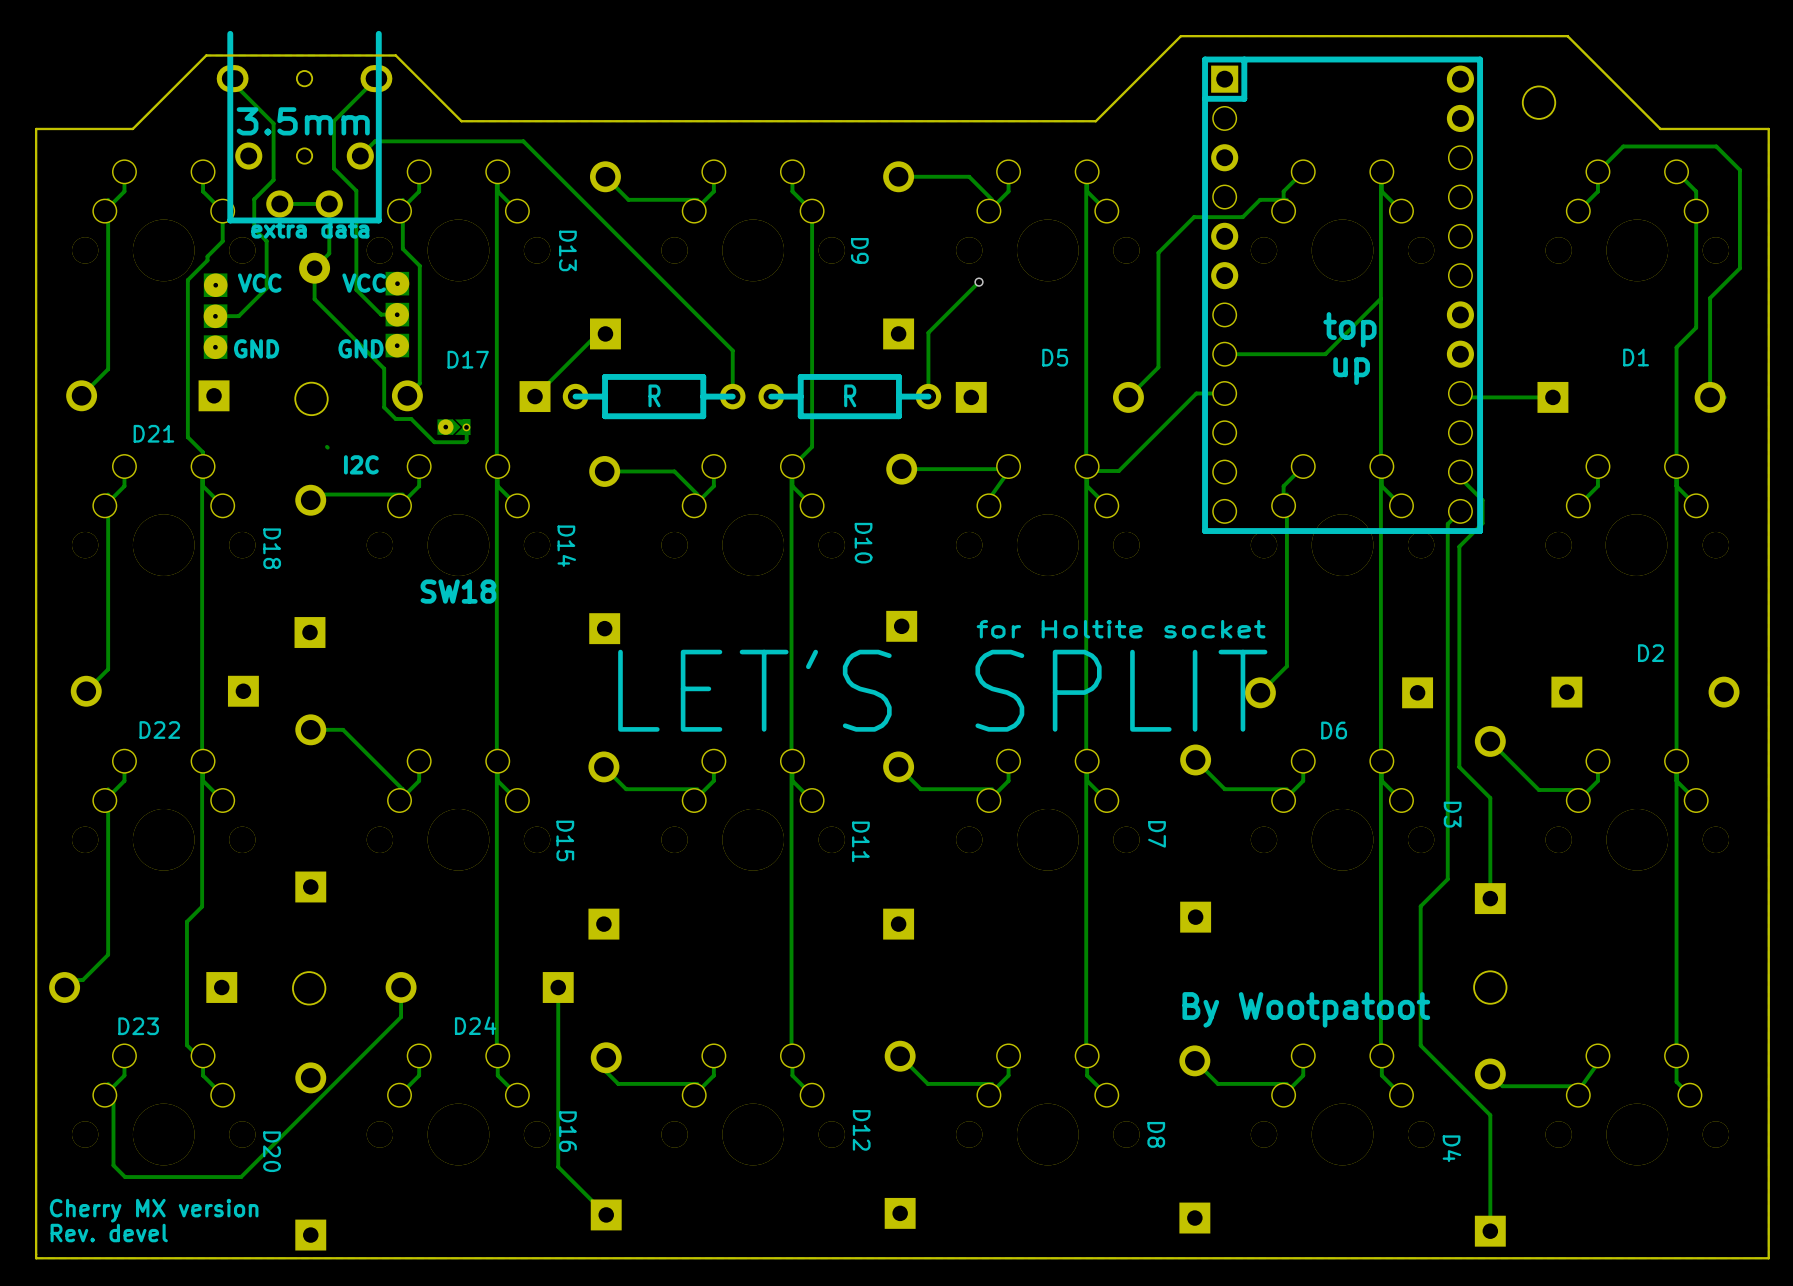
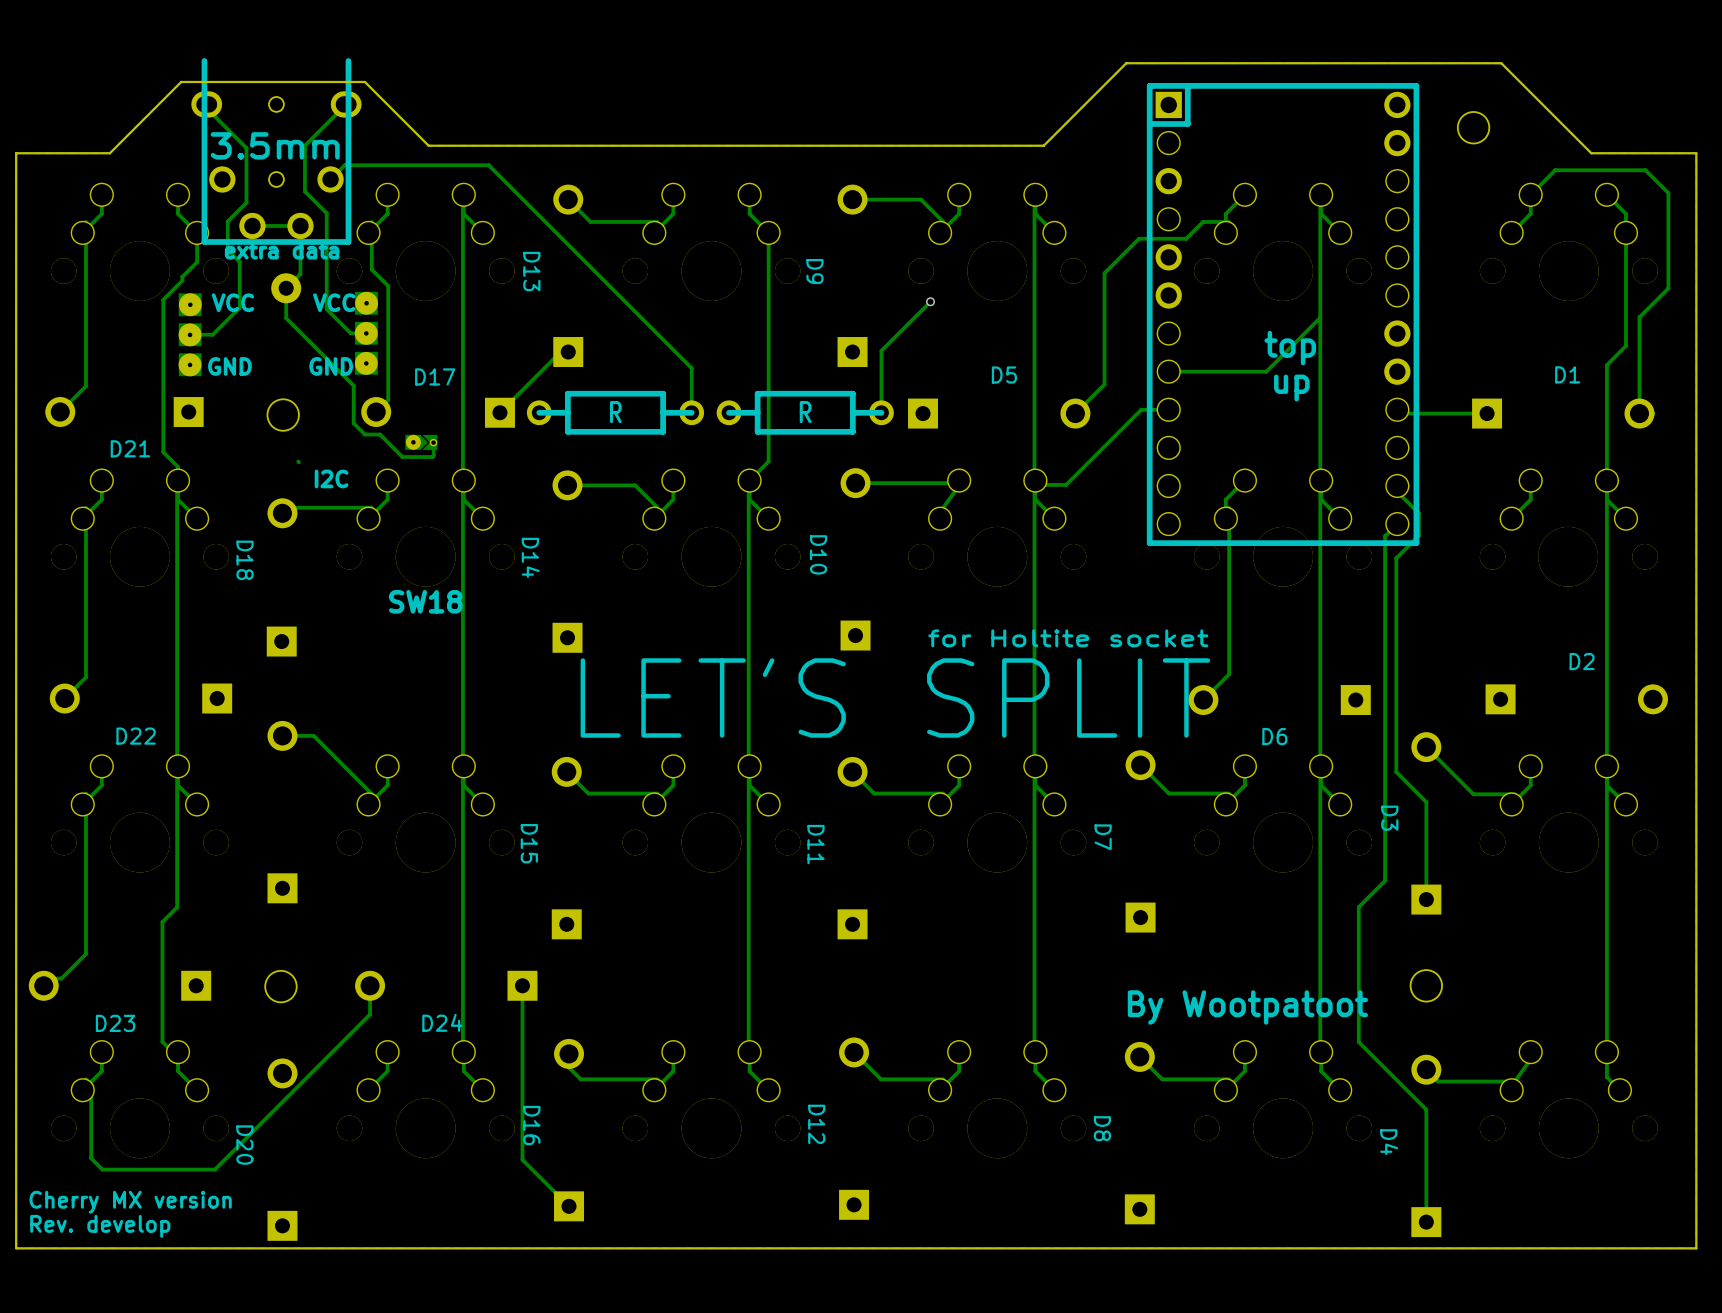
text: Rev. devel (109, 1233) -> Rev. develop (100, 1226)

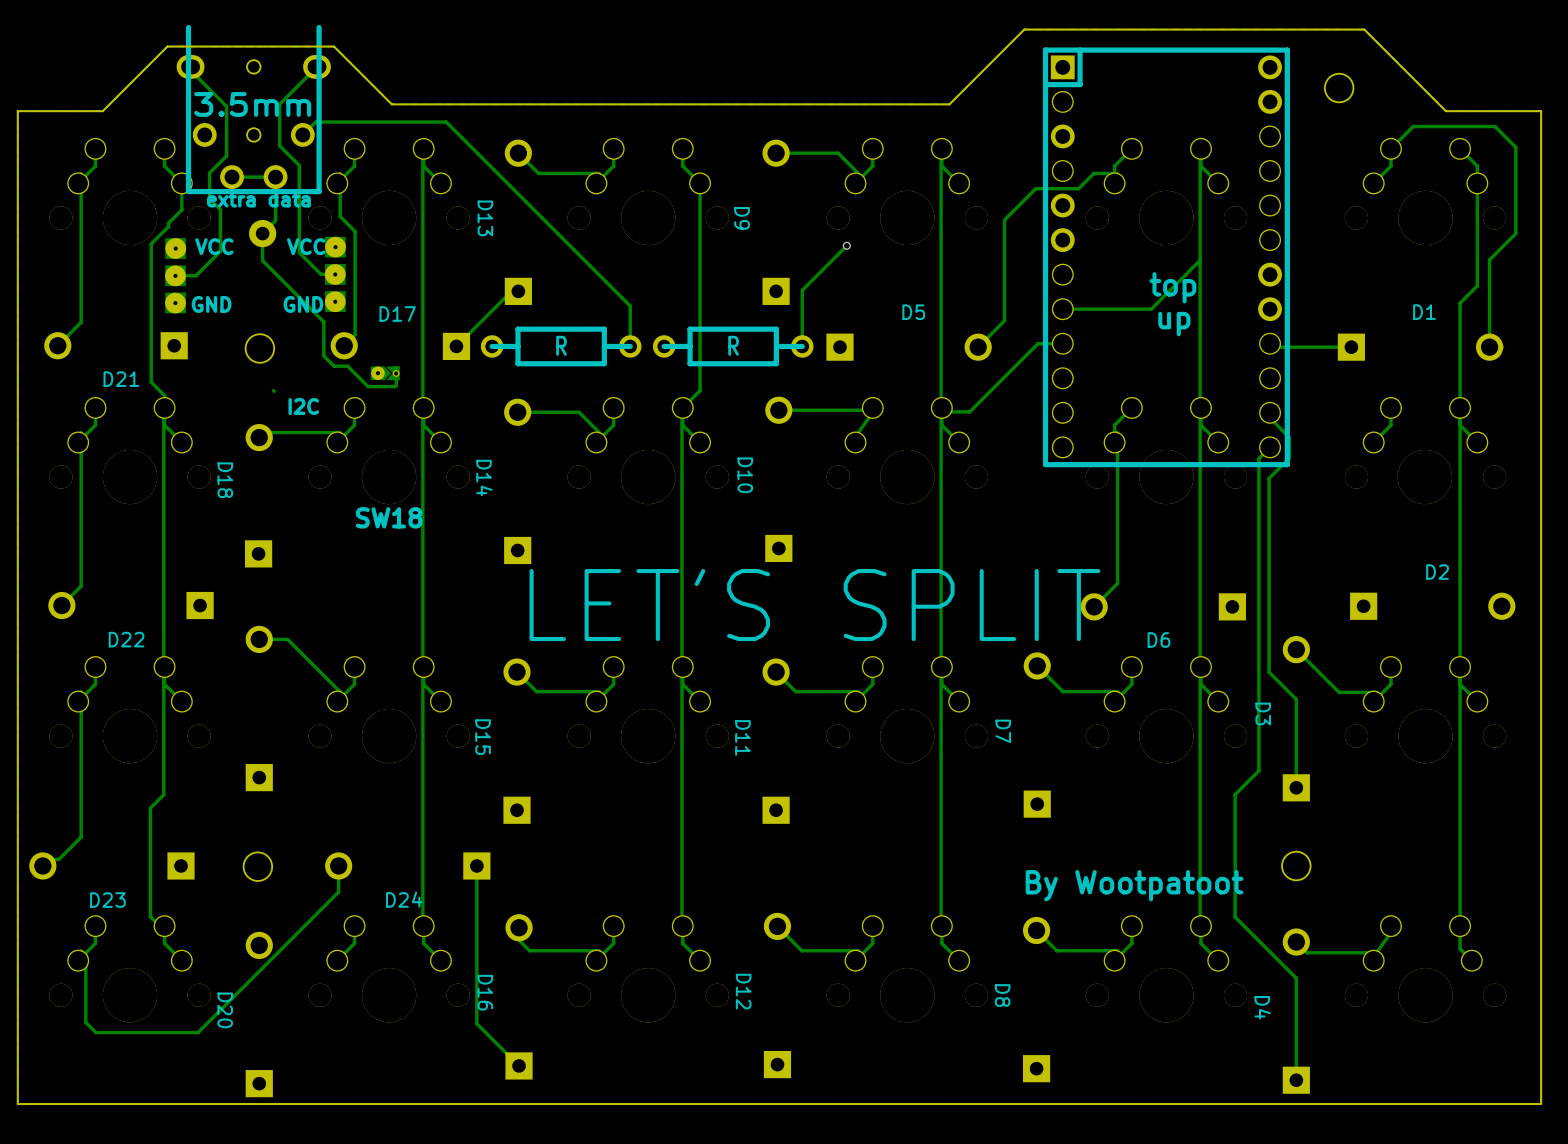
text: for Holtite socket (1068, 638) -> none
text: Cherry MX version (130, 1202) -> none
text: Rev. develop (100, 1226) -> none

